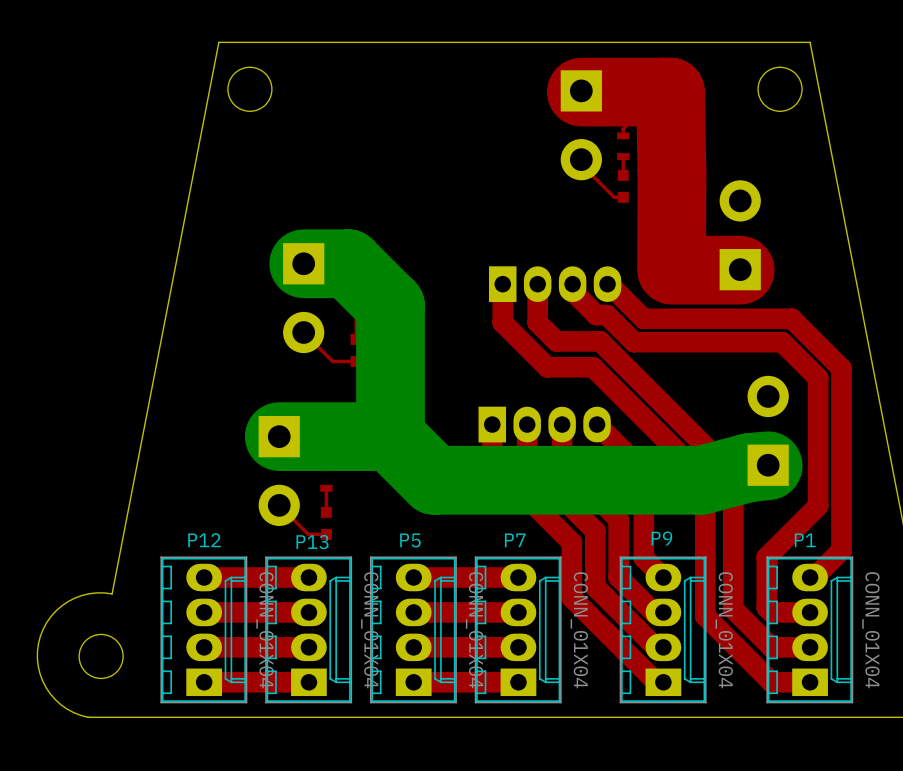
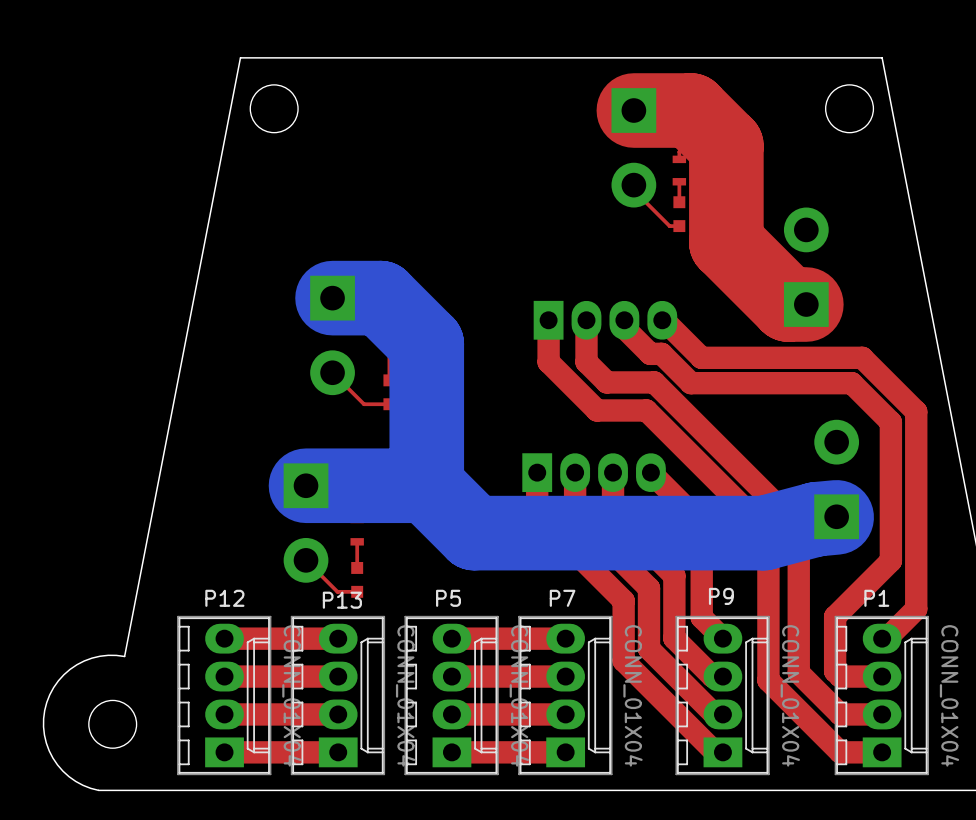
top track: none -> (633, 110) (691, 110) (726, 145) (726, 242) (788, 304) (806, 304)
top track: (581, 92) (670, 92) (671, 269) (740, 270) -> none

